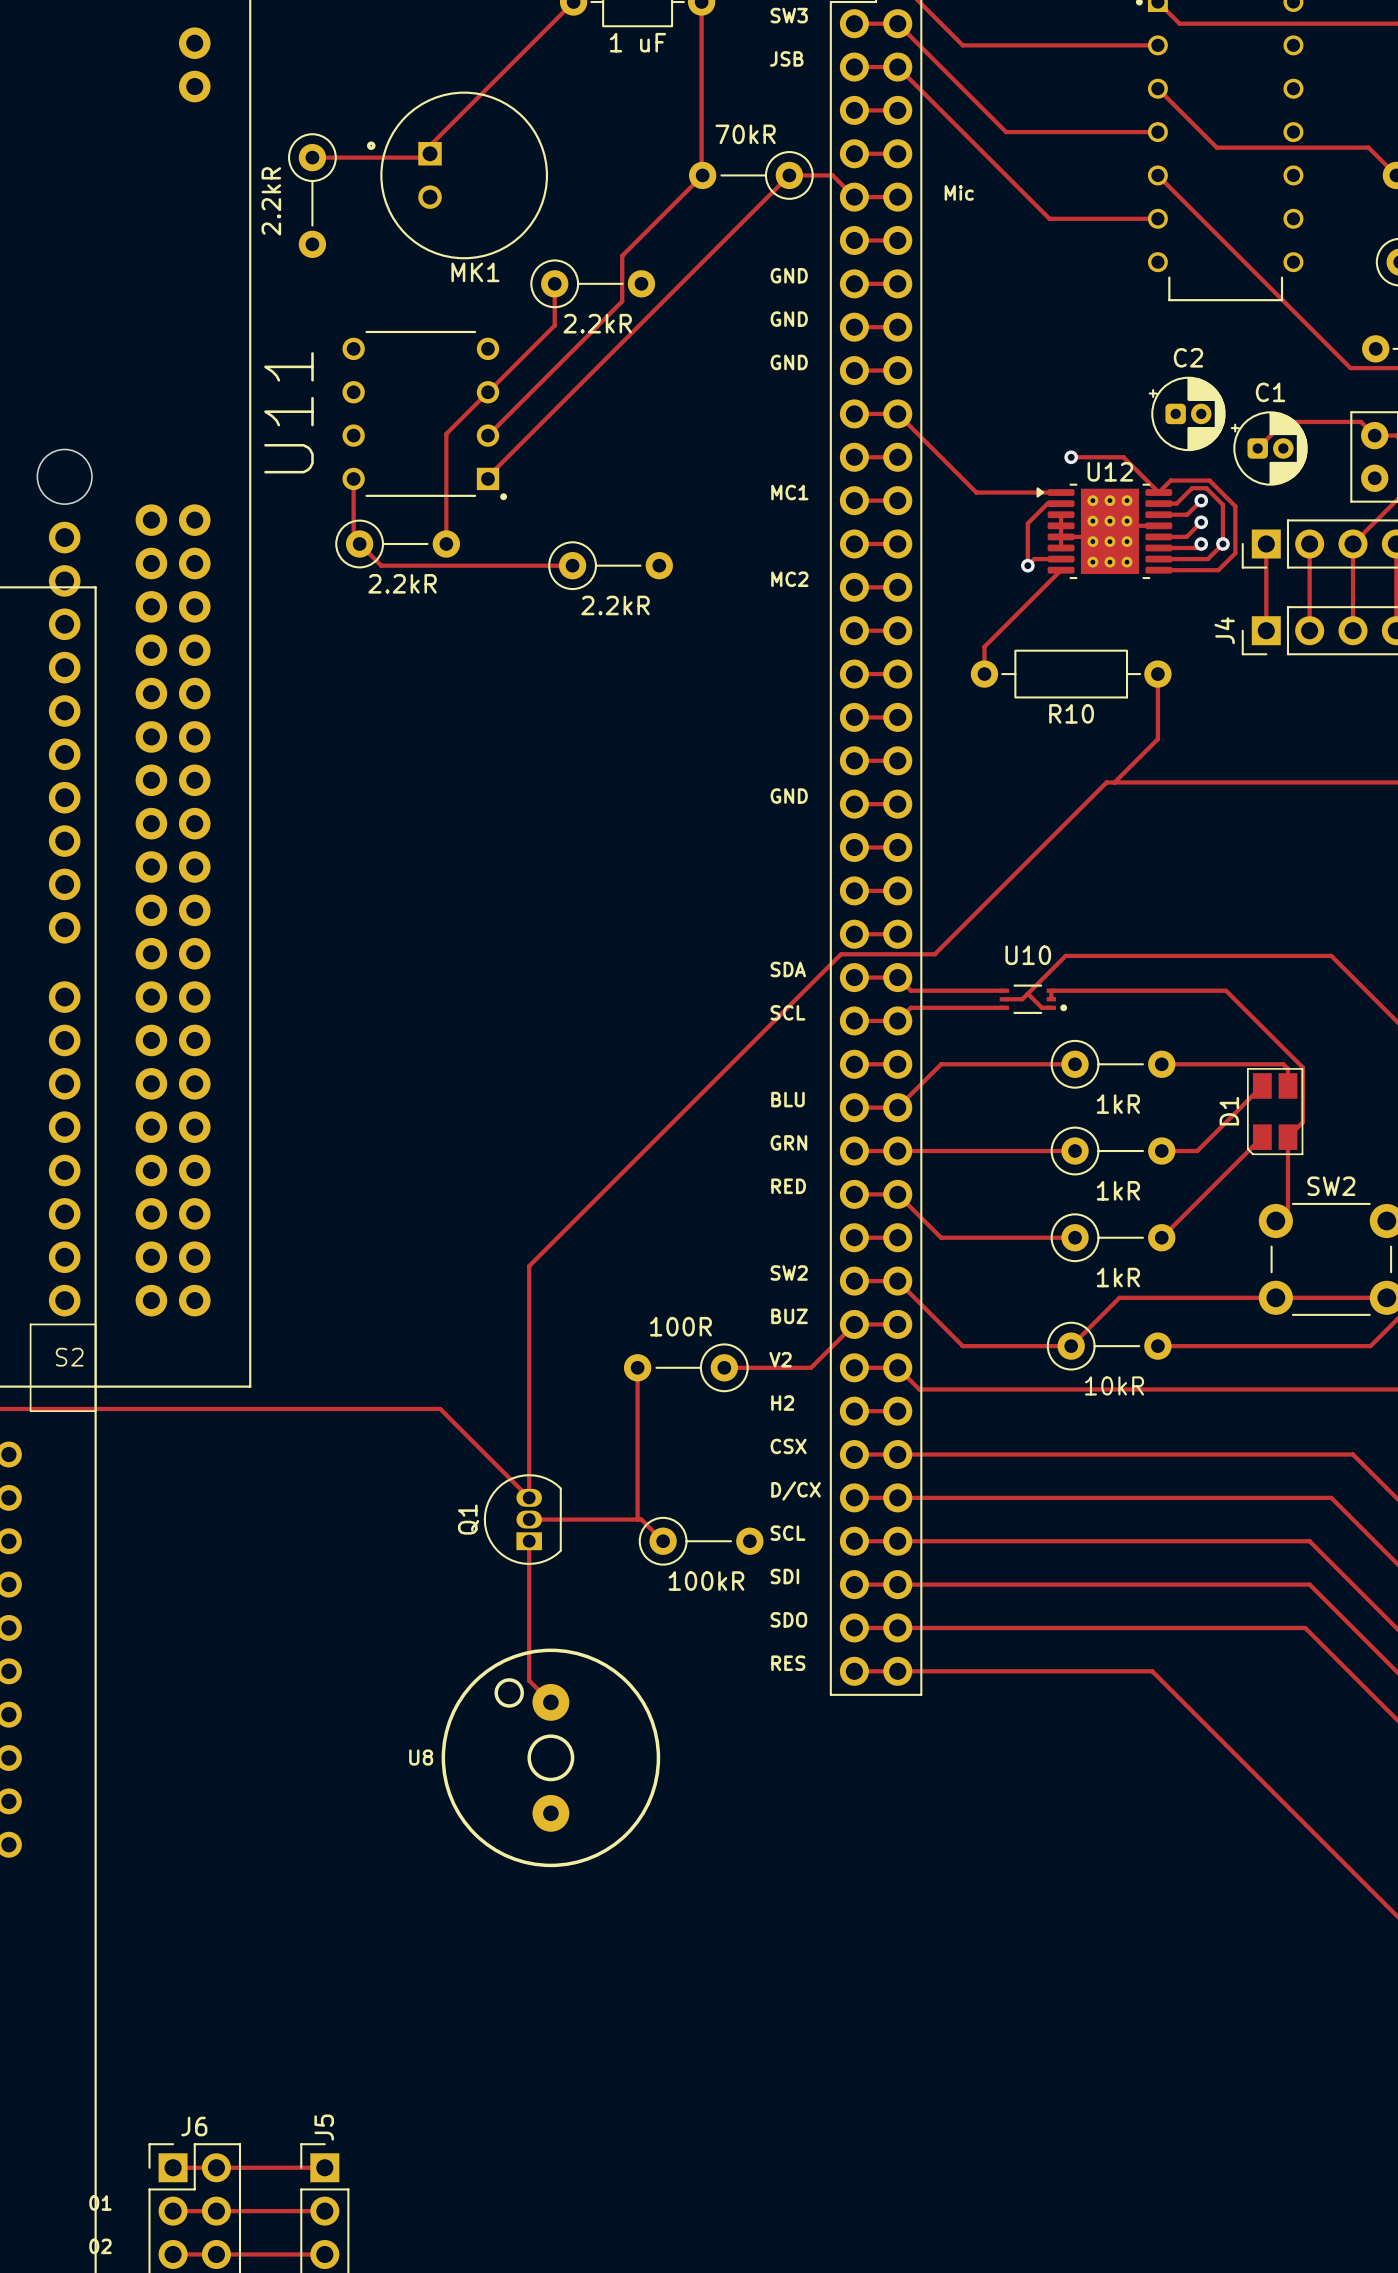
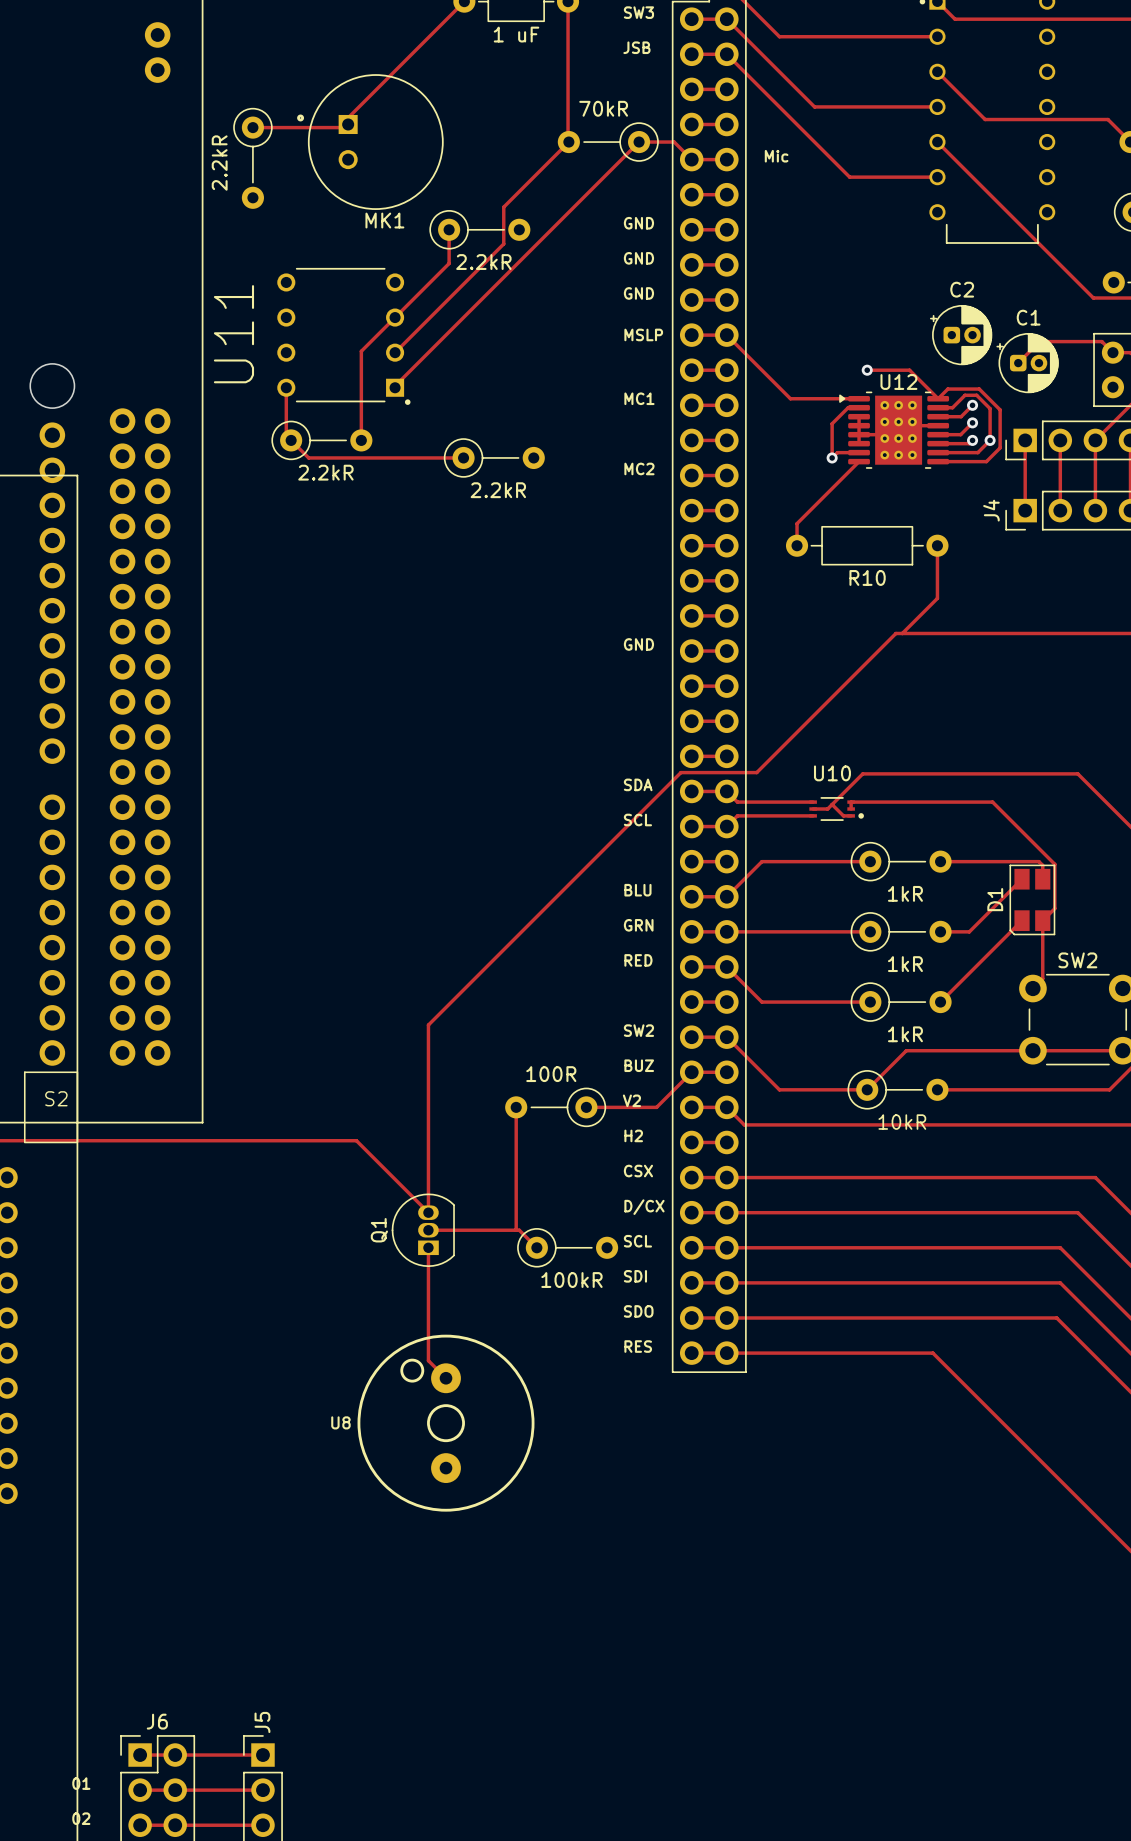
text: none -> MSLP (643, 334)

